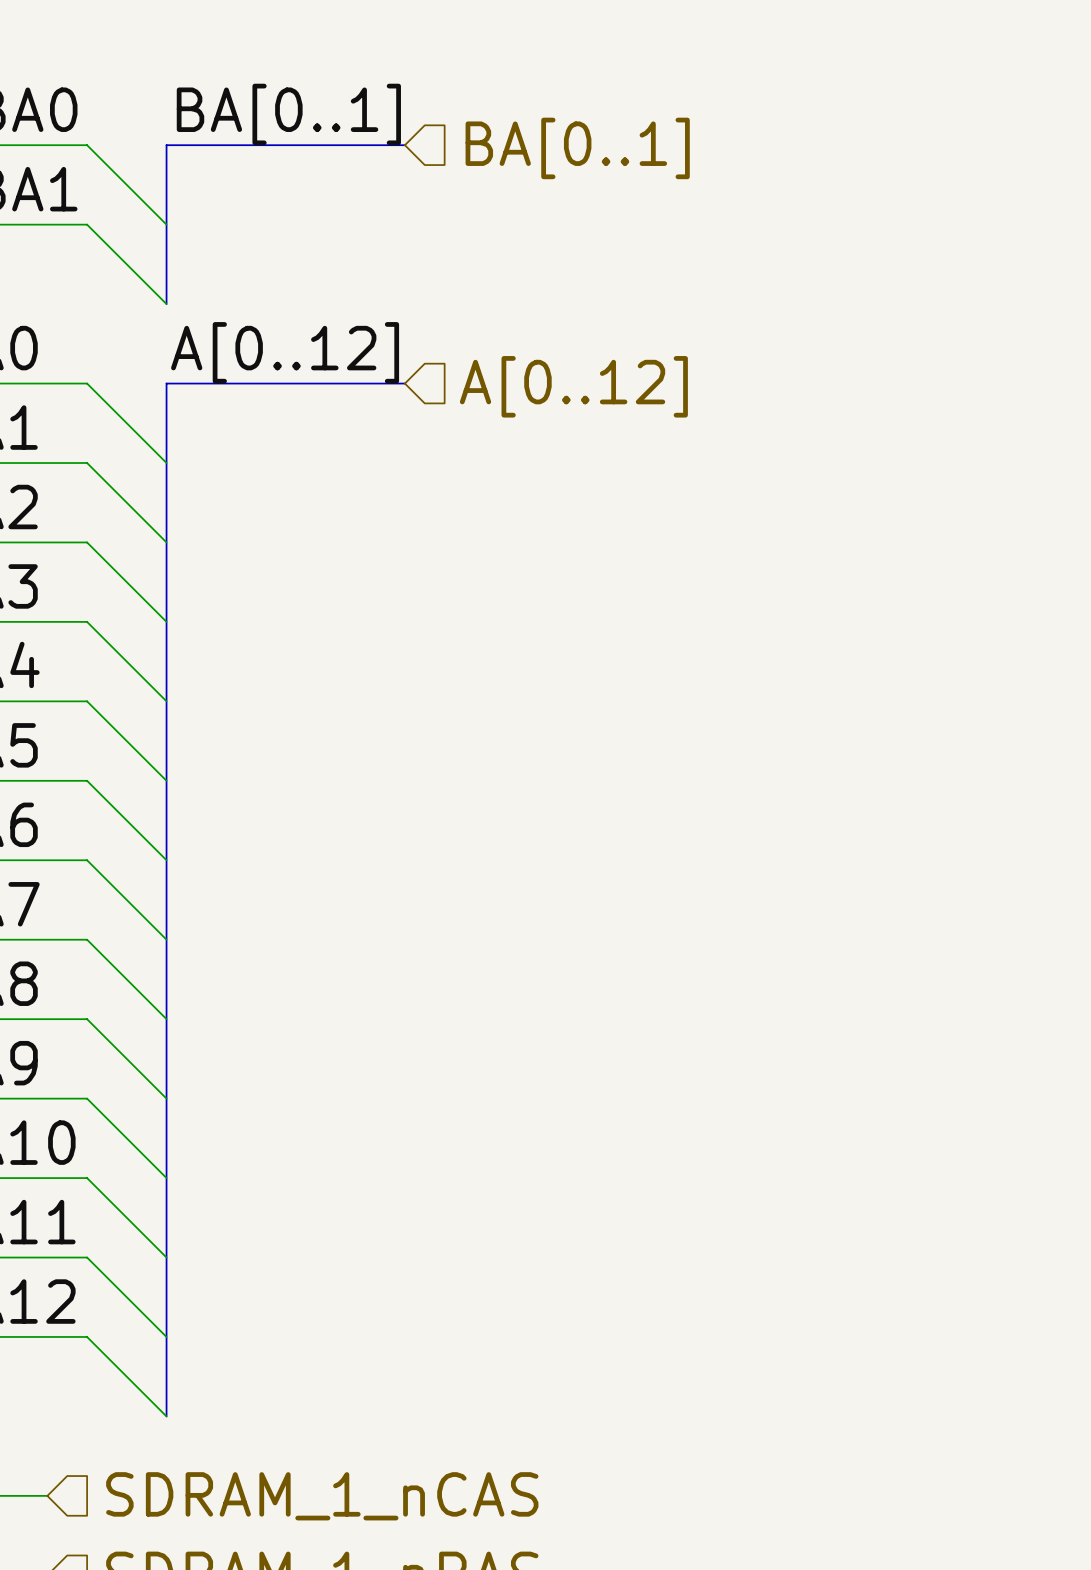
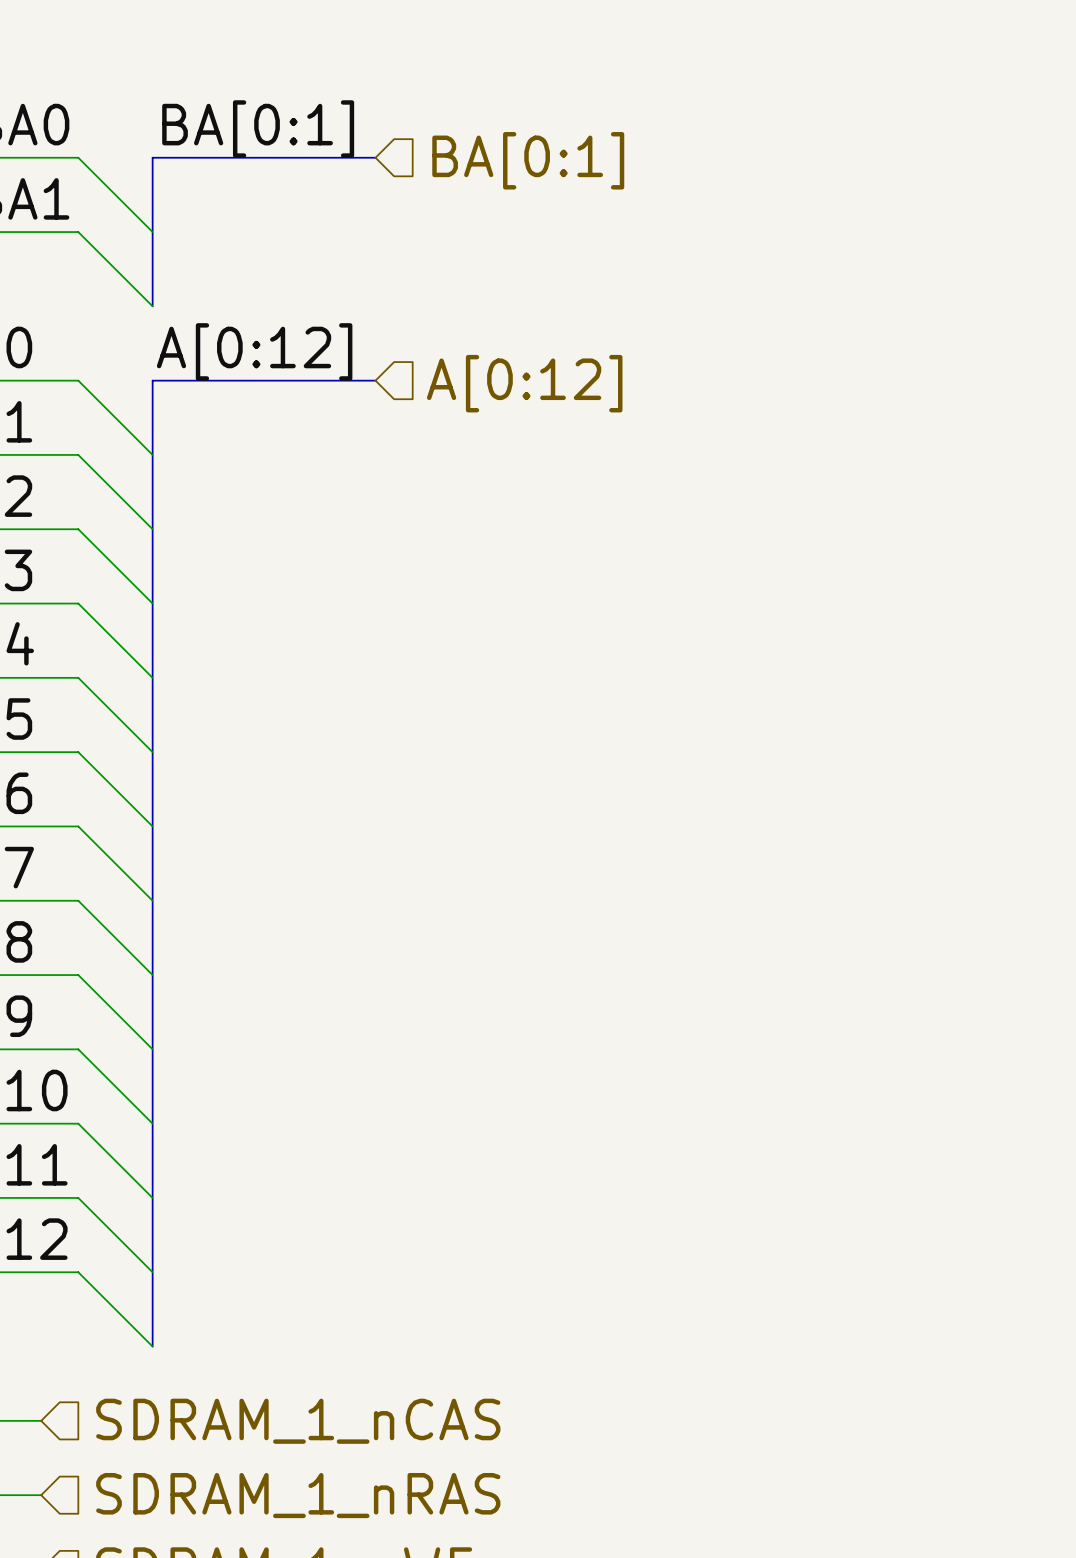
label: BA[0..1] (288, 114) -> BA[0:1] (258, 129)
hierarchical label: BA[0..1] (577, 148) -> BA[0:1] (528, 160)
label: A[0..12] (285, 352) -> A[0:12] (254, 351)
hierarchical label: A[0..12] (573, 386) -> A[0:12] (524, 383)

